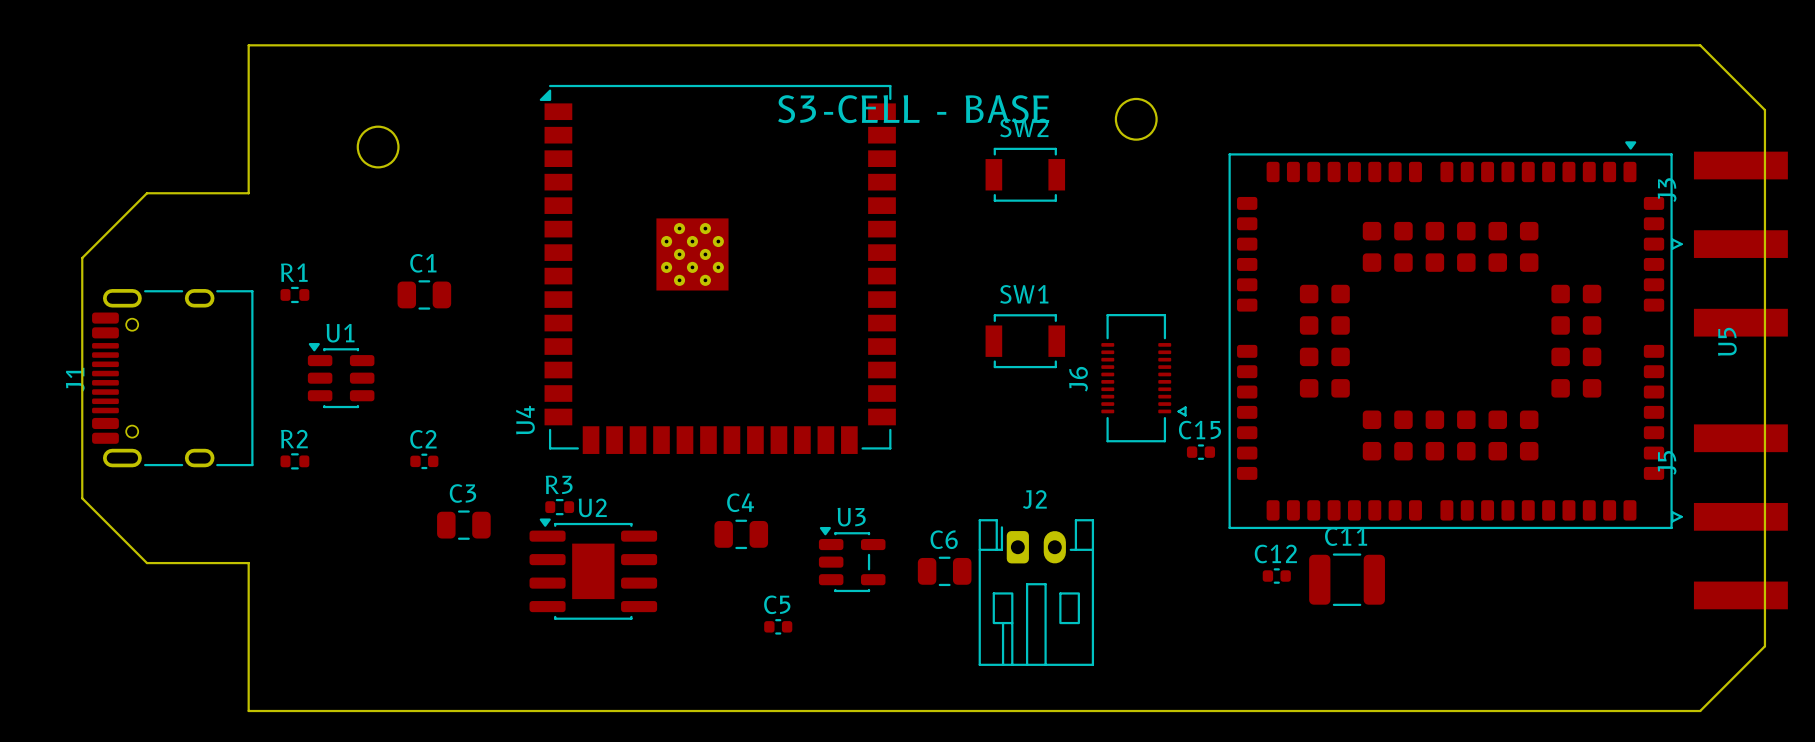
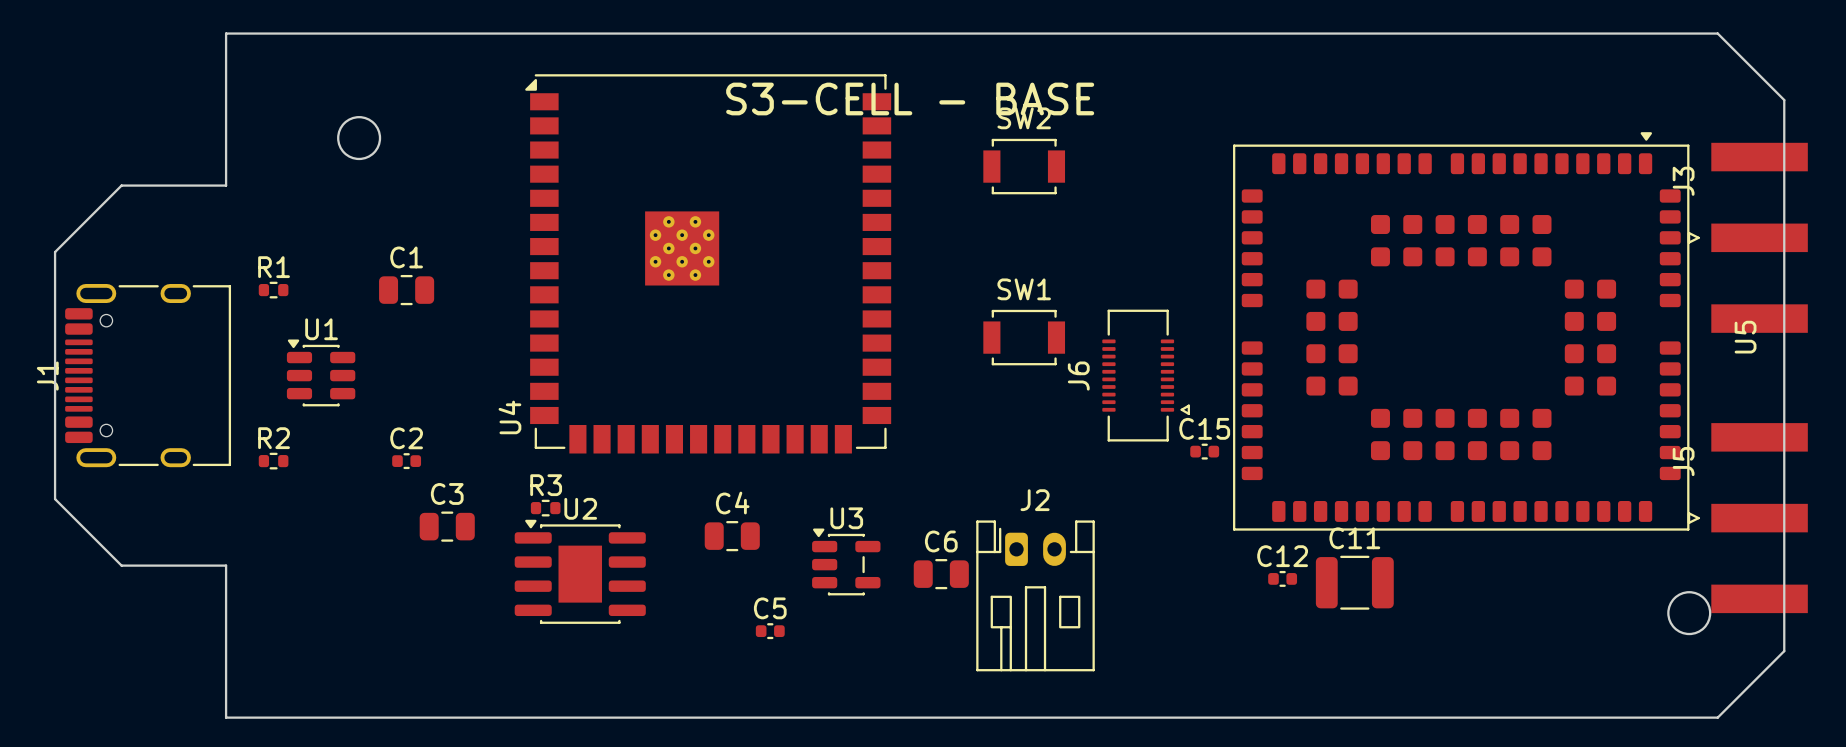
round board edge: [1114, 97, 1158, 141] -> none
round board edge: none -> [1667, 591, 1712, 636]

